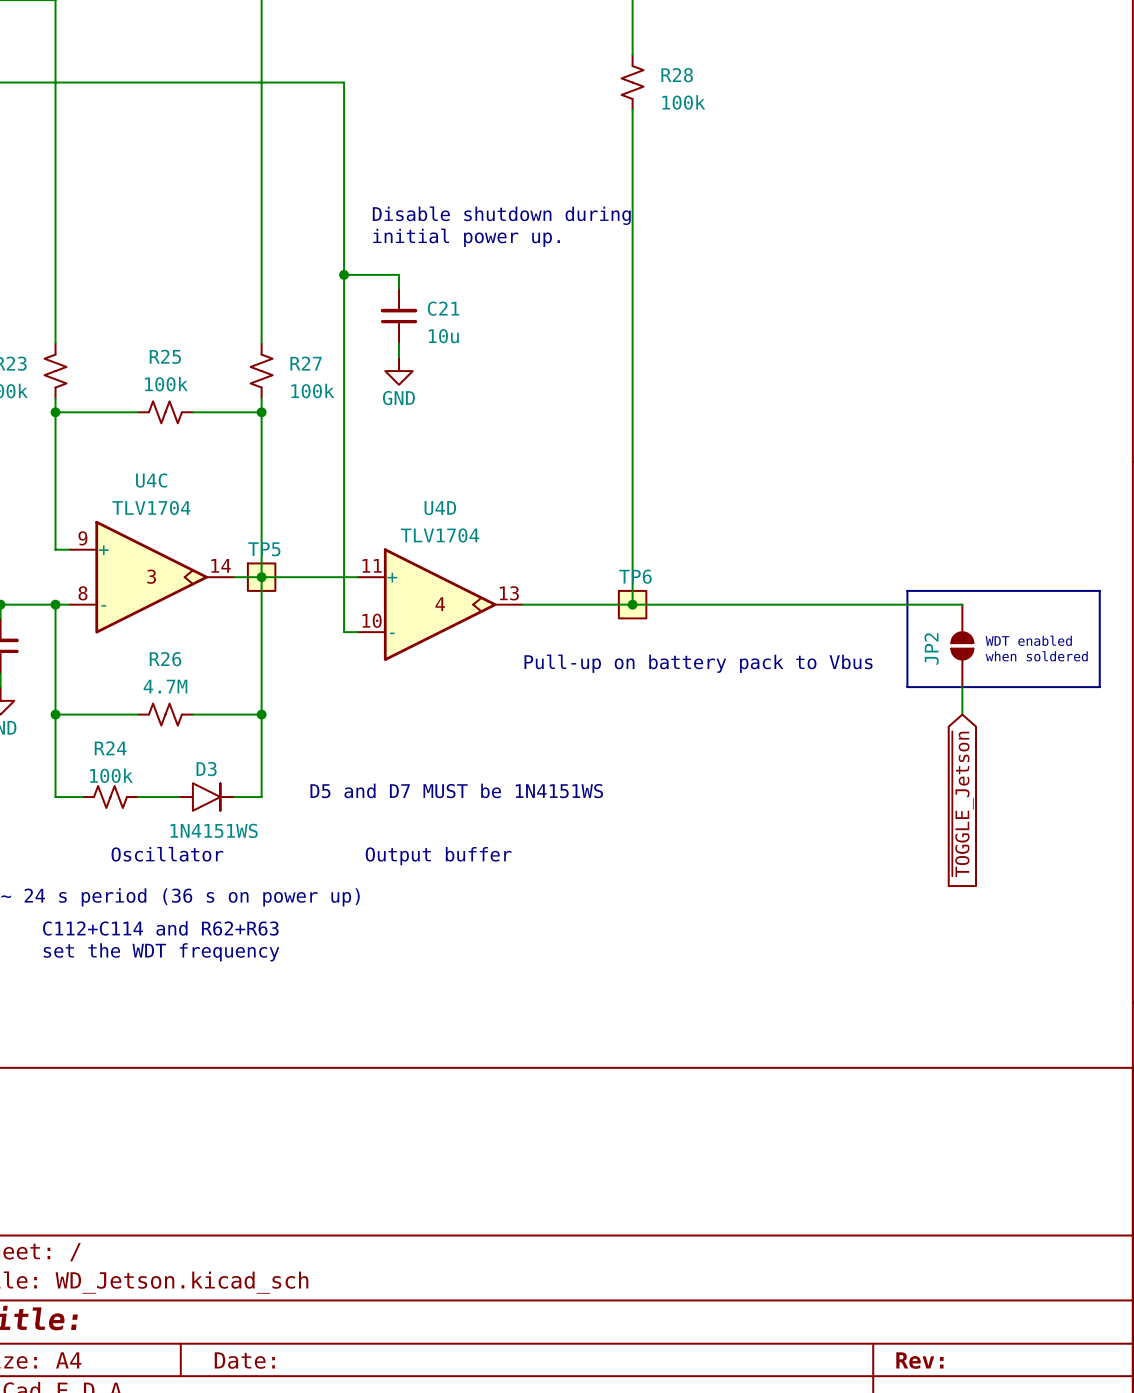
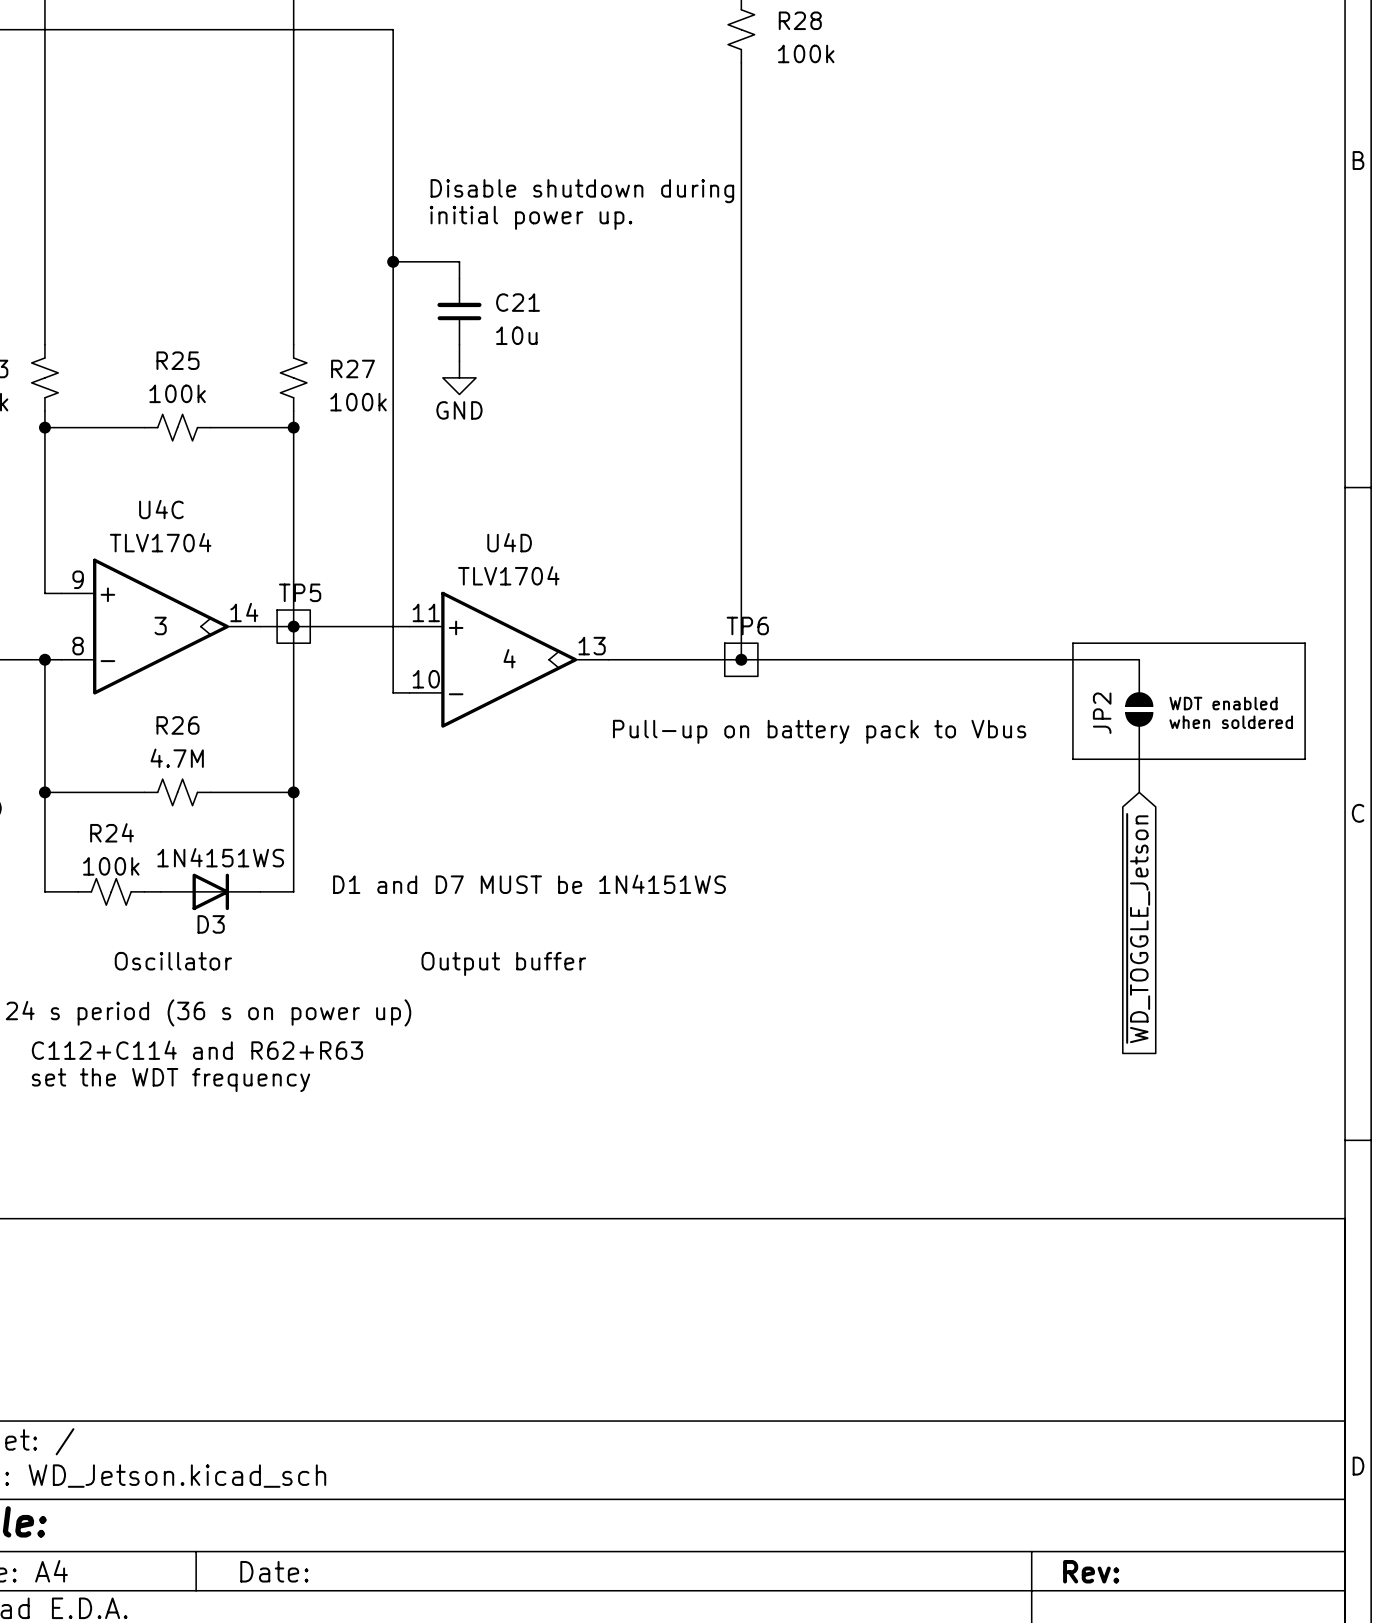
D3 name position: D3 (206, 769) -> D3 (211, 924)
D3 symbol: [179, 783, 235, 811] -> [161, 873, 261, 911]
text: D5 and D7 MUST be 1N4151WS (456, 790) -> D1 and D7 MUST be 1N4151WS (529, 884)
global label: ~{TOGGLE_Jetson} (963, 804) -> ~{WD_TOGGLE_Jetson} (1138, 928)
D3 value position: 1N4151WS (214, 830) -> 1N4151WS (220, 857)

